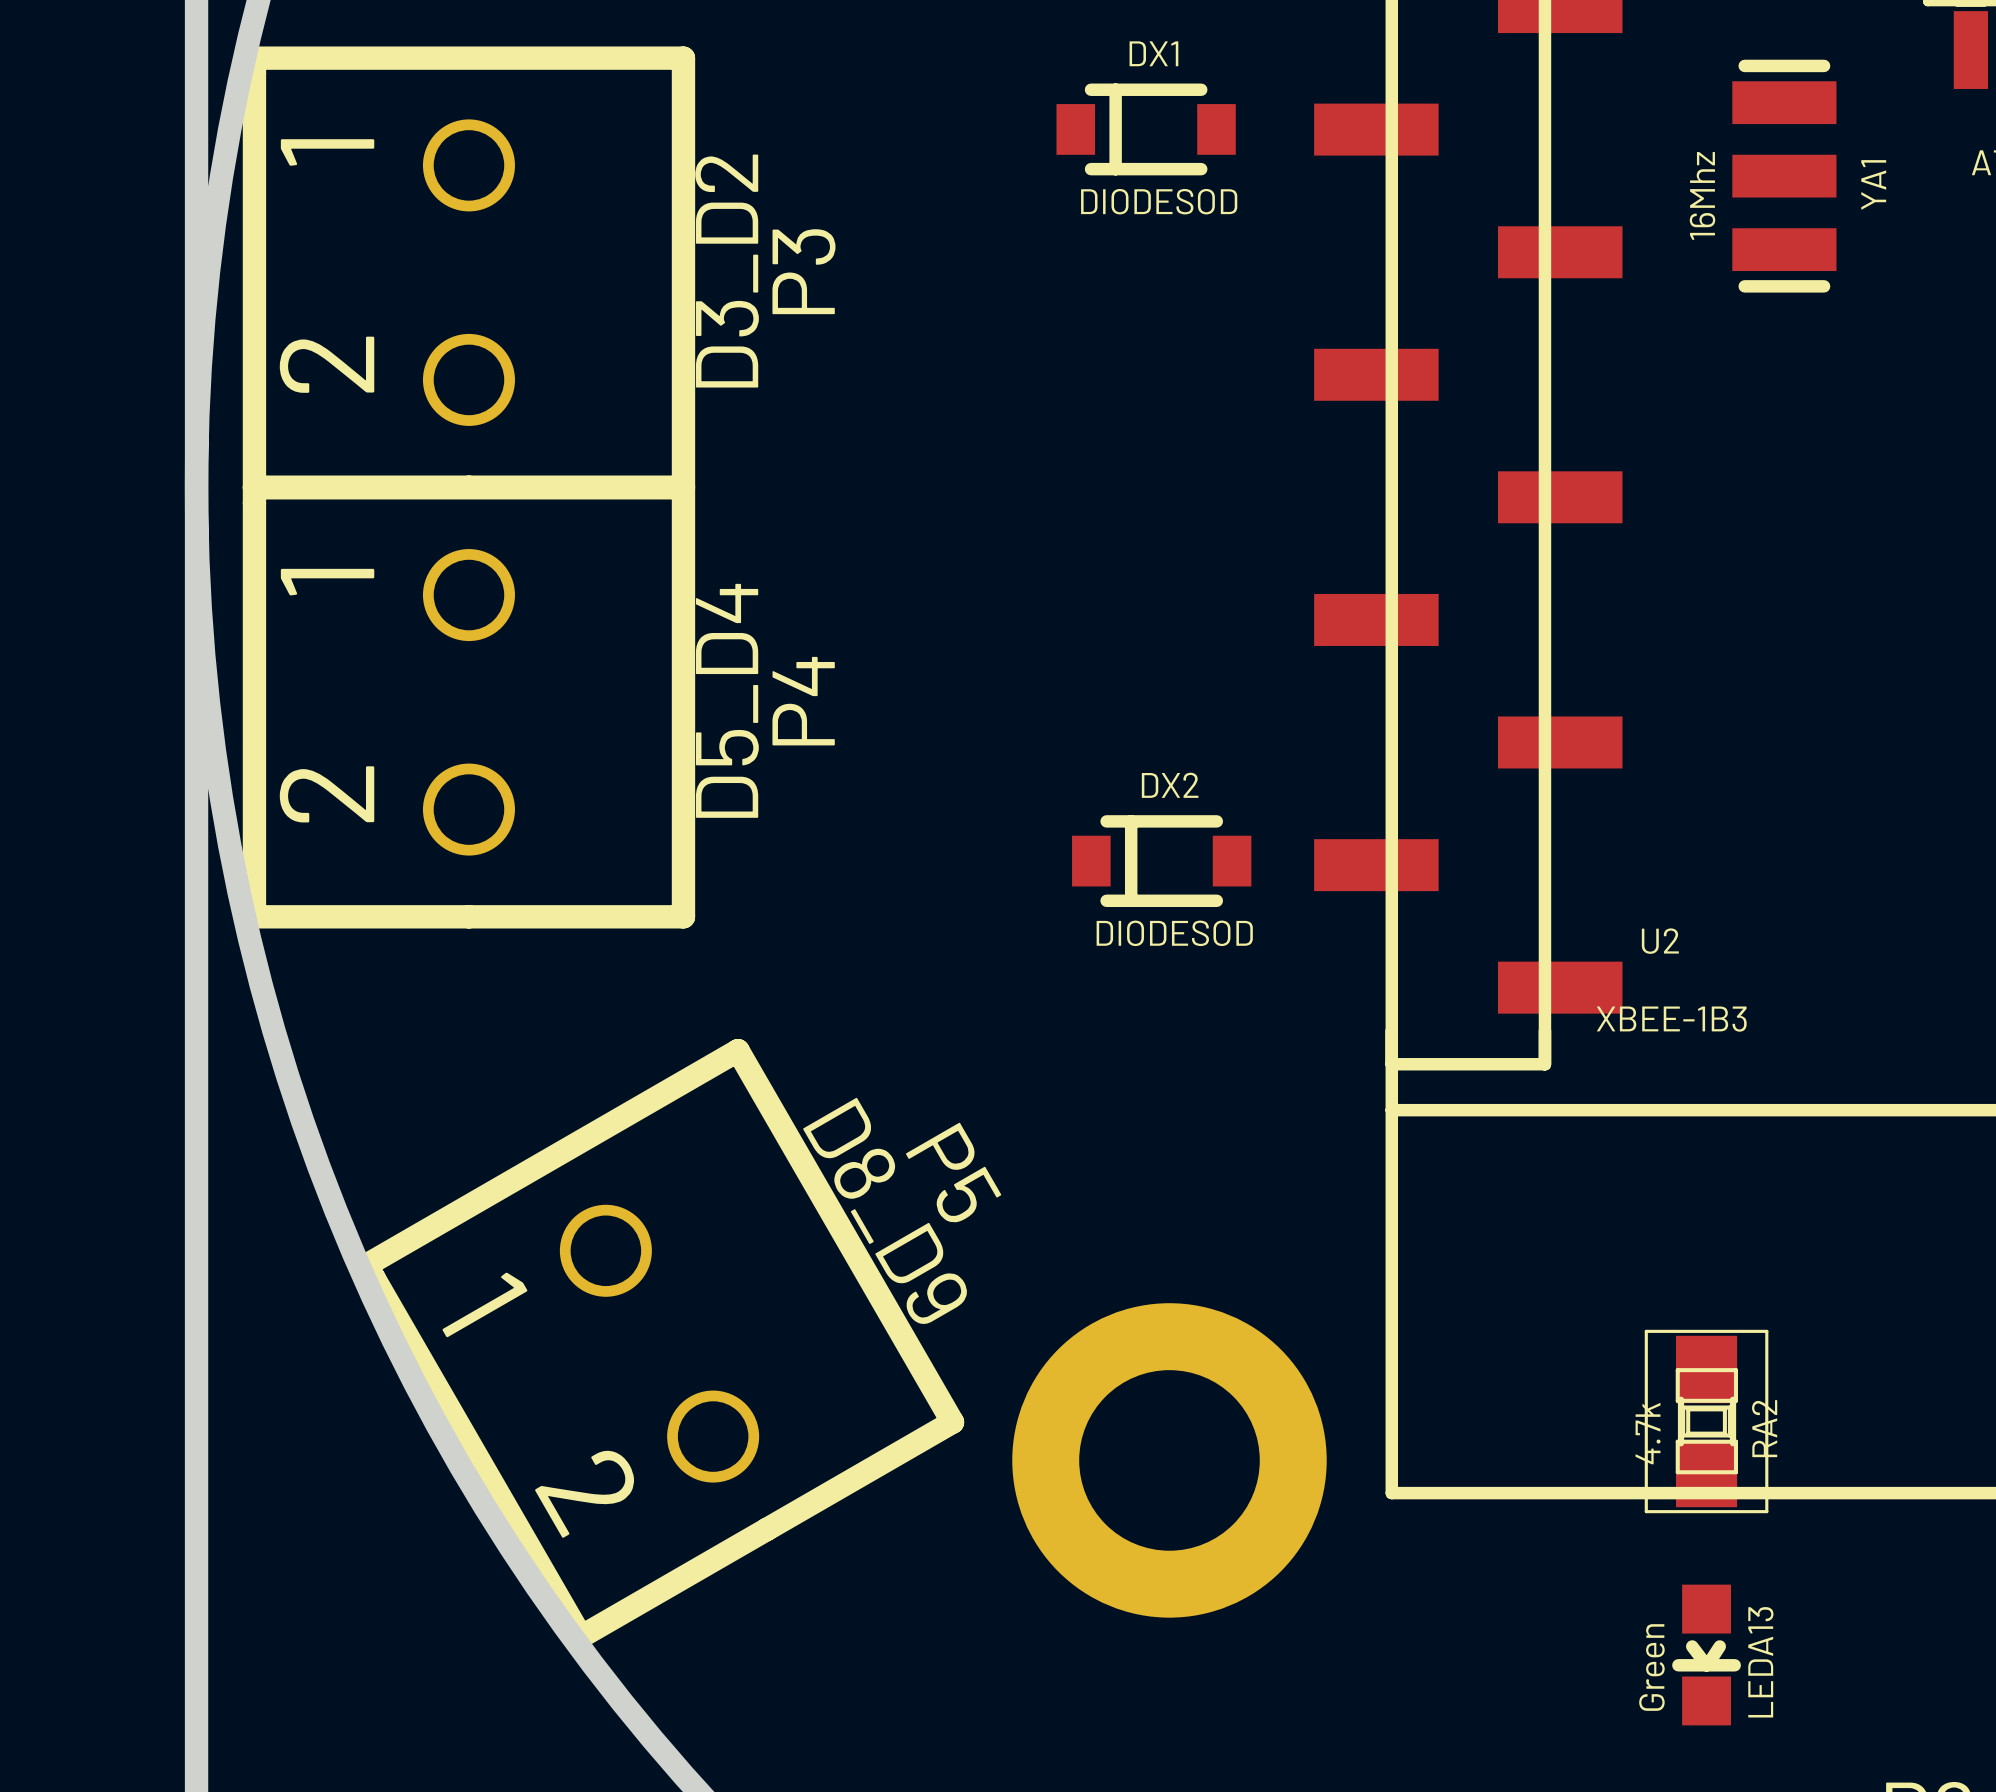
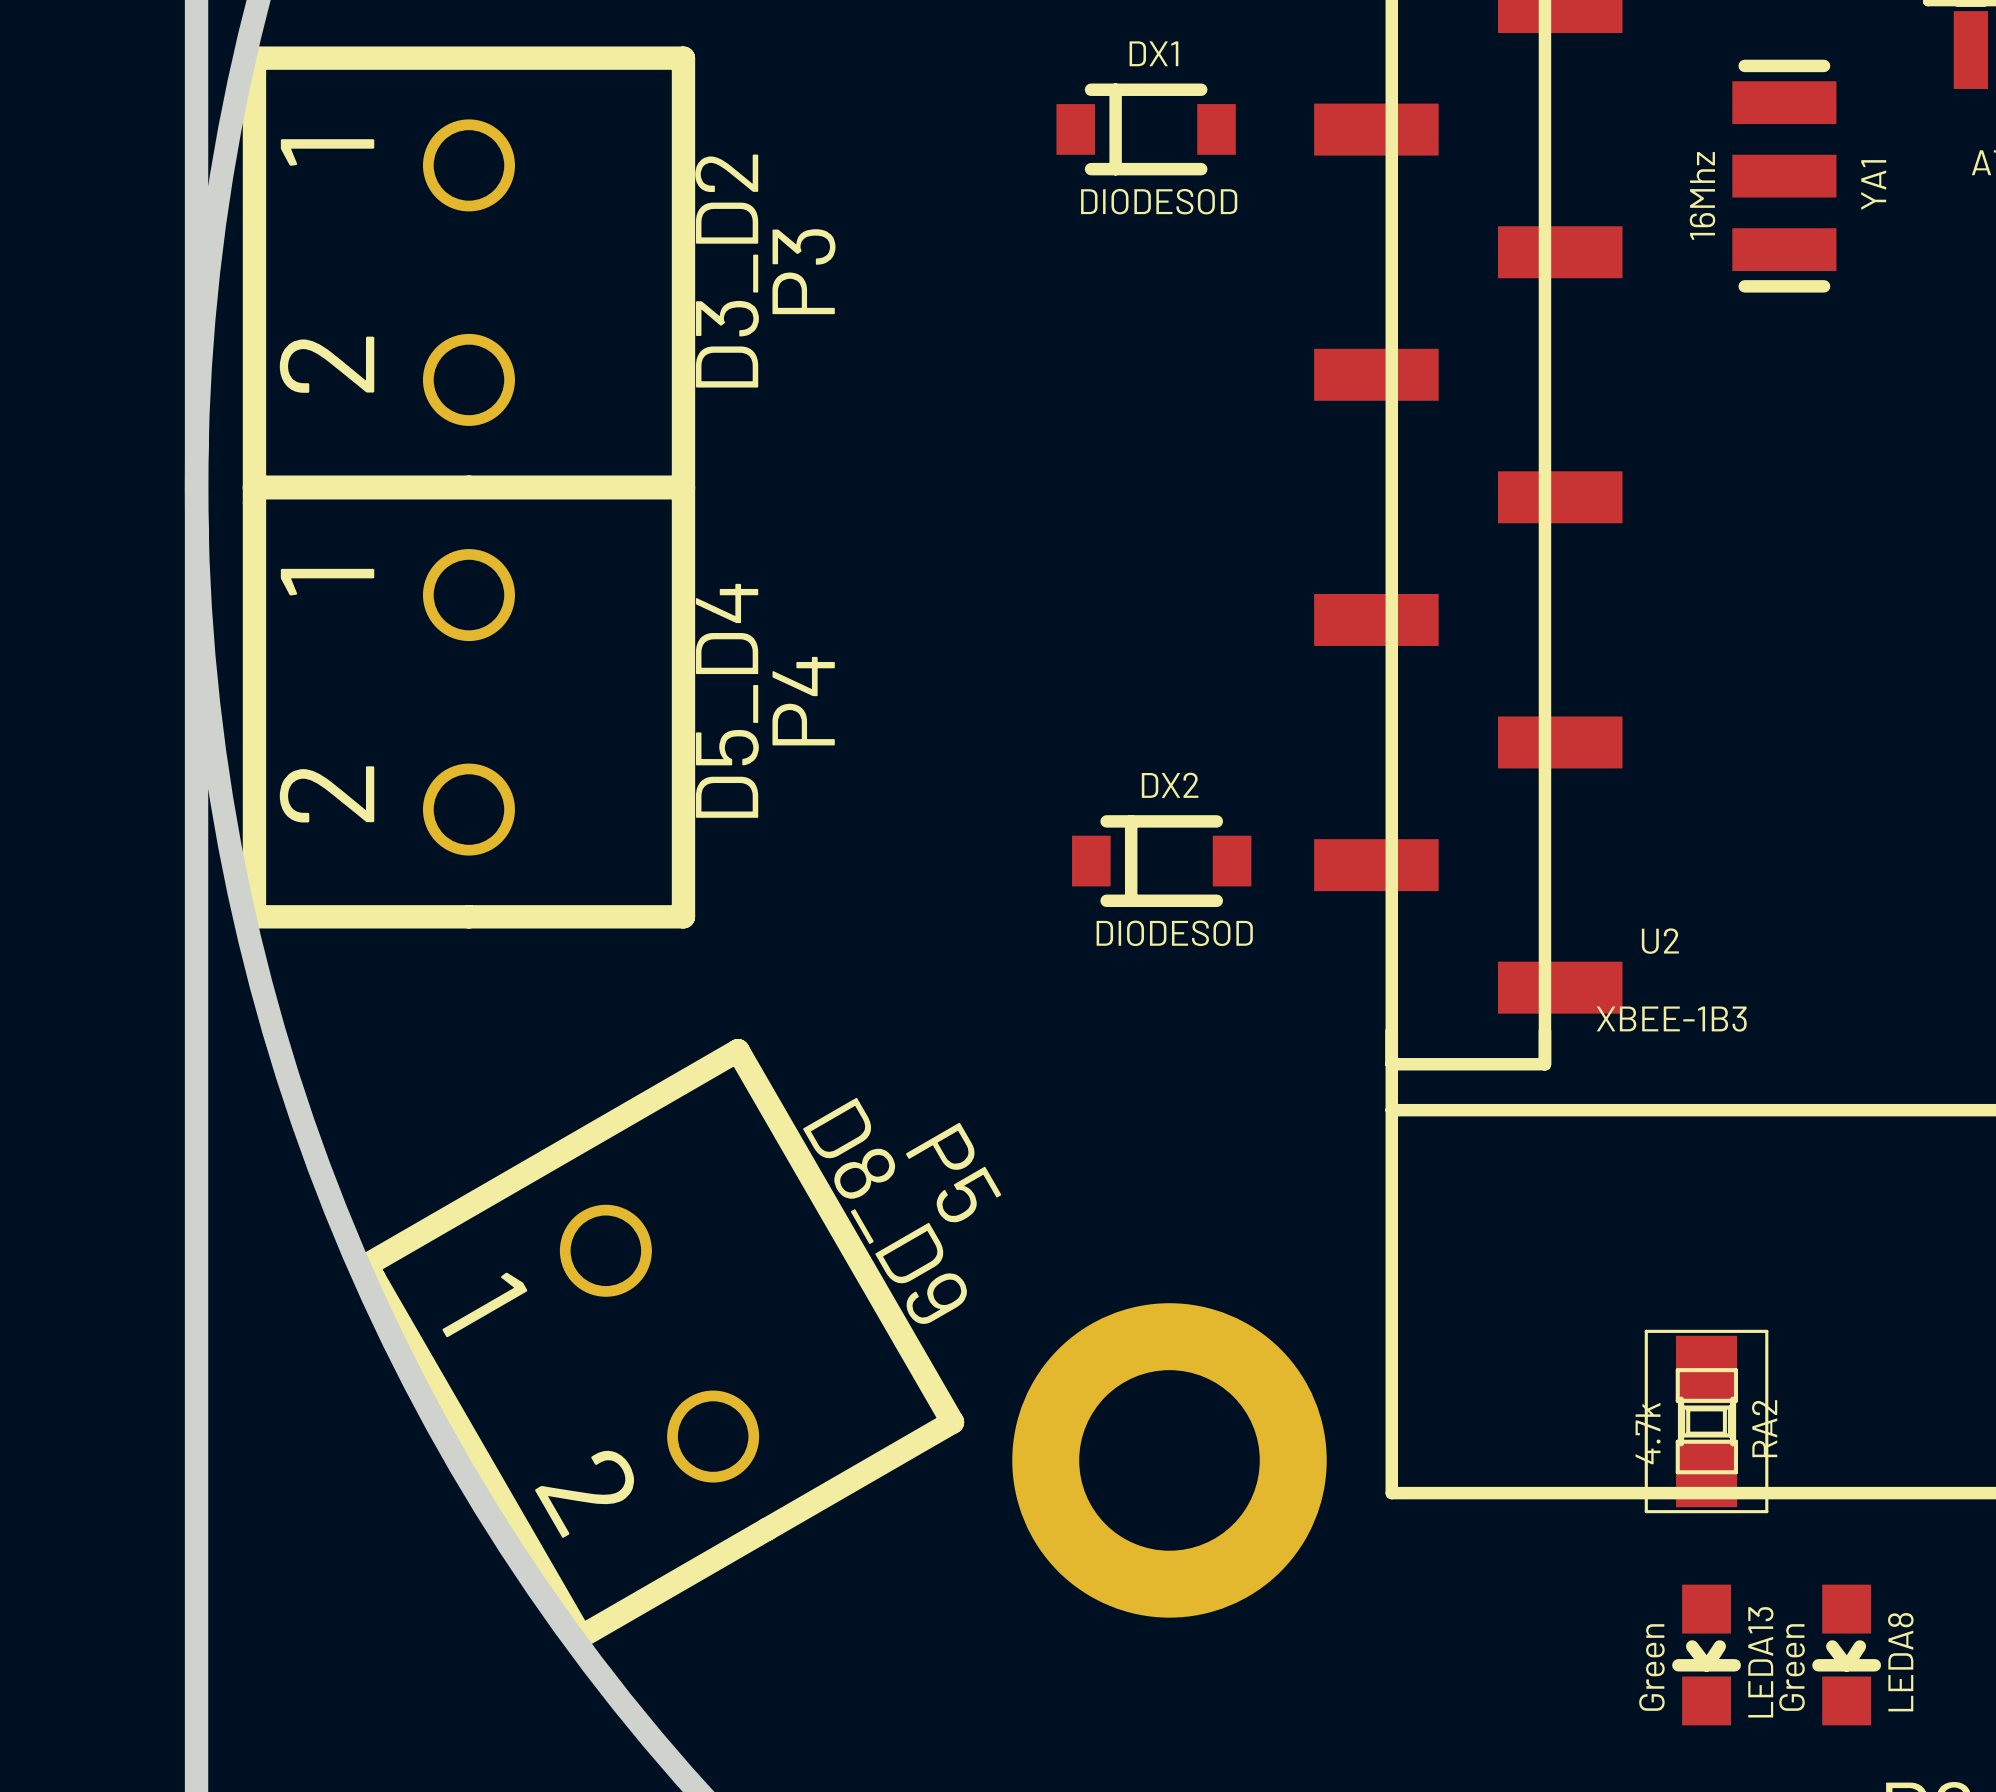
LEDA8: none -> Green (1846, 1655)

